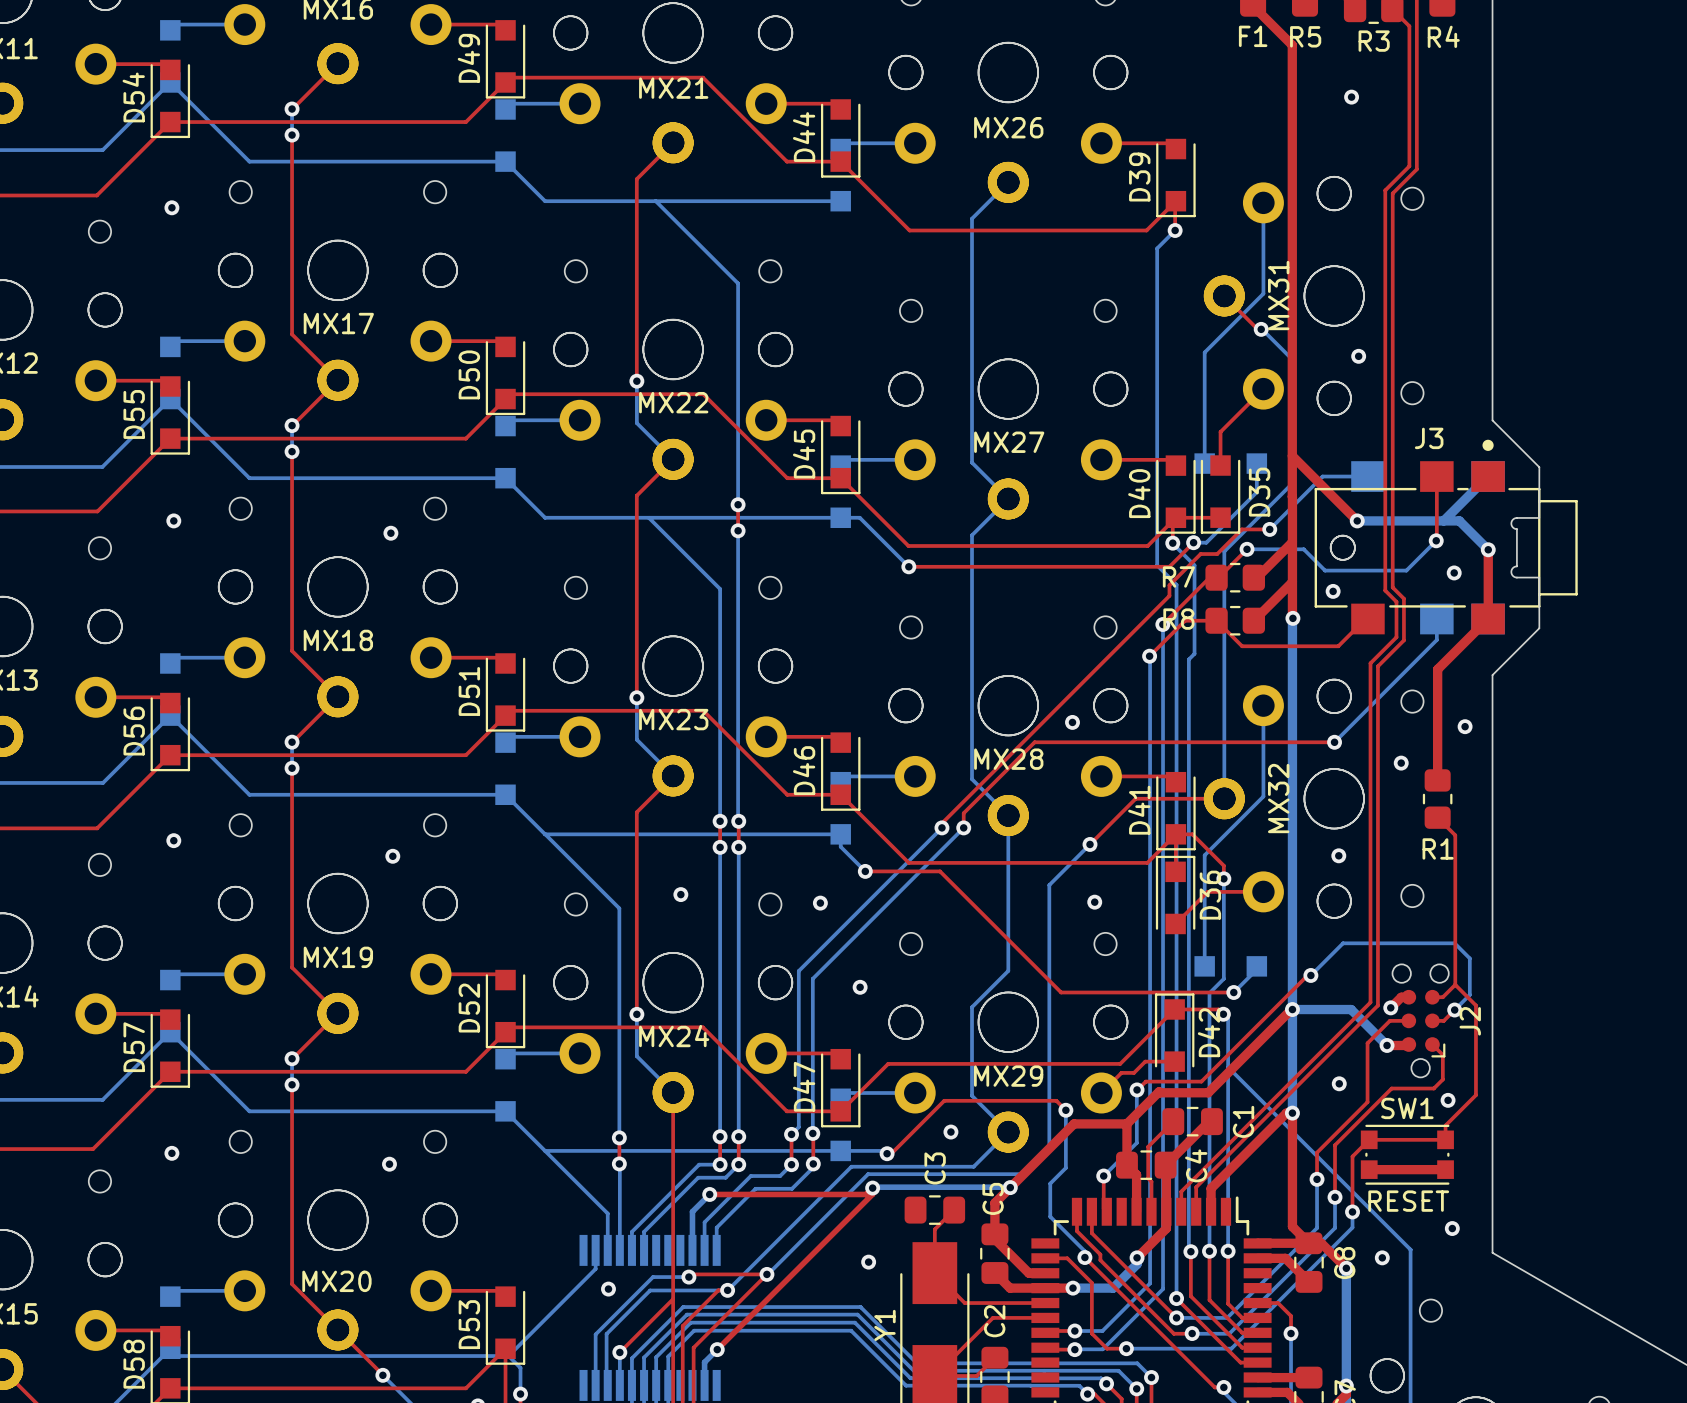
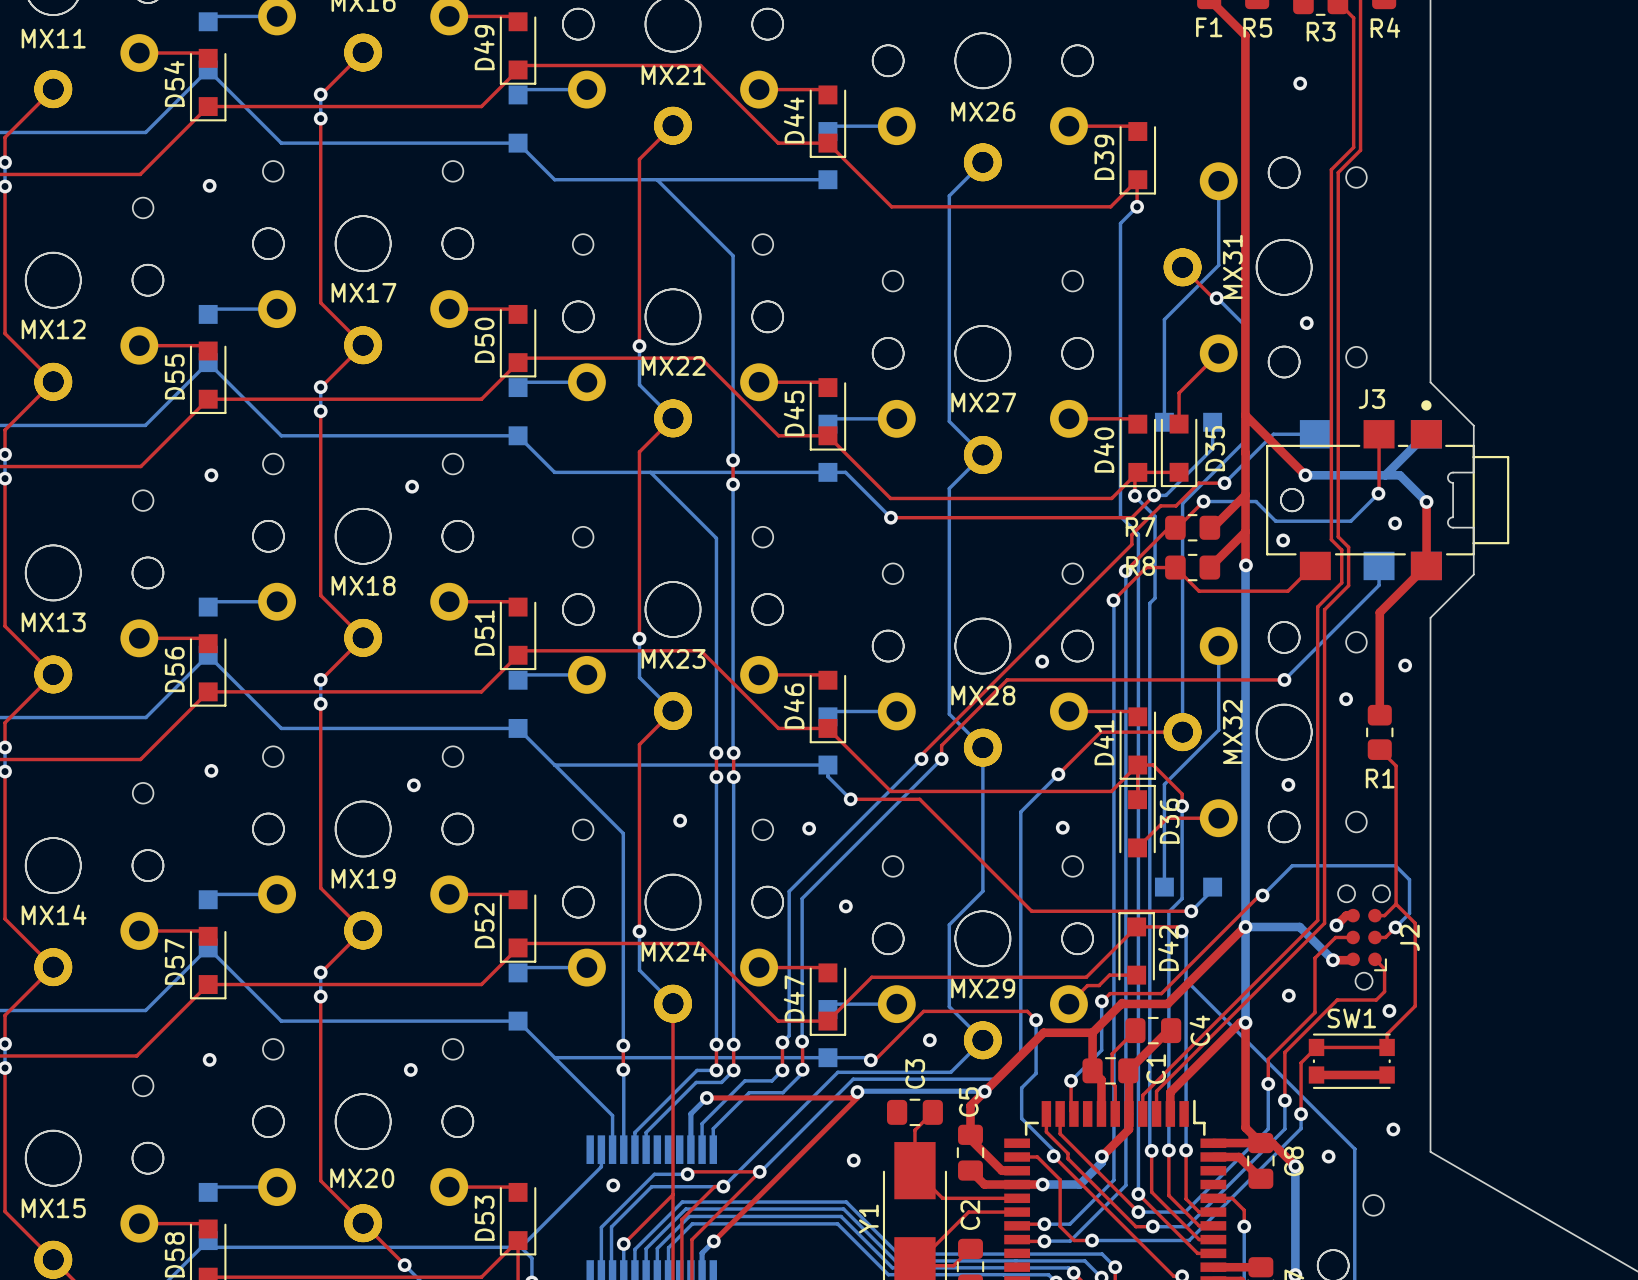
C1 name position: C1 (1243, 1121) -> C1 (1156, 1069)
C4 name position: C4 (1196, 1165) -> C4 (1199, 1030)
text: RESET (1408, 1201) -> none

